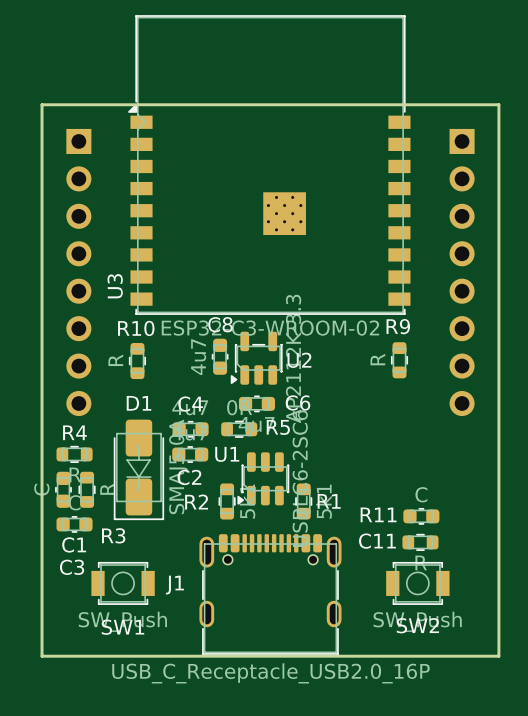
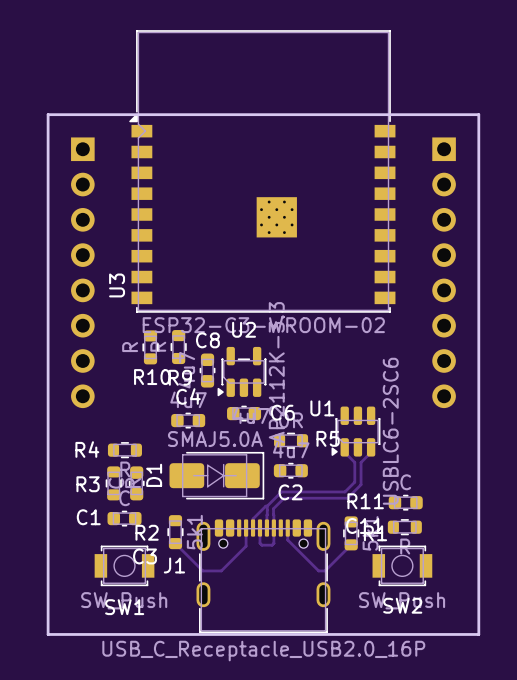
R9 name position: R9 (398, 326) -> R9 (180, 377)
R10 name position: R10 (136, 328) -> R10 (152, 377)
C8 position: (220, 356) -> (207, 370)
U2 position: (256, 358) -> (241, 371)
U2 name position: U2 (299, 360) -> U2 (244, 329)
R9 position: (399, 360) -> (178, 347)
R10 position: (137, 361) -> (150, 347)
C6 position: (256, 403) -> (244, 413)
R5 position: (239, 429) -> (291, 440)
R4 name position: R4 (74, 432) -> R4 (87, 449)
R4 position: (74, 454) -> (124, 450)
C2 position: (190, 454) -> (290, 470)
track: none -> (344, 447) (344, 452) (354, 462) (354, 482) (344, 491) (281, 491) (267, 506)
track: none -> (371, 447) (371, 452) (361, 462) (361, 484) (347, 498) (284, 498) (273, 508) (273, 543) (272, 545) (261, 545) (259, 543) (259, 528)
D1 rotation: 0° (138, 469) -> 90° counterclockwise (216, 475)
D1 position: (138, 469) -> (216, 475)
U1 position: (263, 478) -> (355, 431)
C3 position: (63, 489) -> (136, 483)
R3 position: (87, 489) -> (113, 483)
R2 position: (227, 501) -> (175, 532)
R1 position: (303, 501) -> (351, 533)
track: none -> (267, 506) (266, 528)
track: none -> (267, 506) (253, 518) (253, 528)
C1 position: (74, 524) -> (124, 518)
R3 name position: R3 (113, 535) -> R3 (88, 484)
track: none -> (246, 528) (246, 546) (221, 570) (202, 570) (175, 543)
track: none -> (287, 528) (287, 540) (318, 570) (325, 570) (351, 544)
C1 name position: C1 (74, 544) -> C1 (88, 517)

